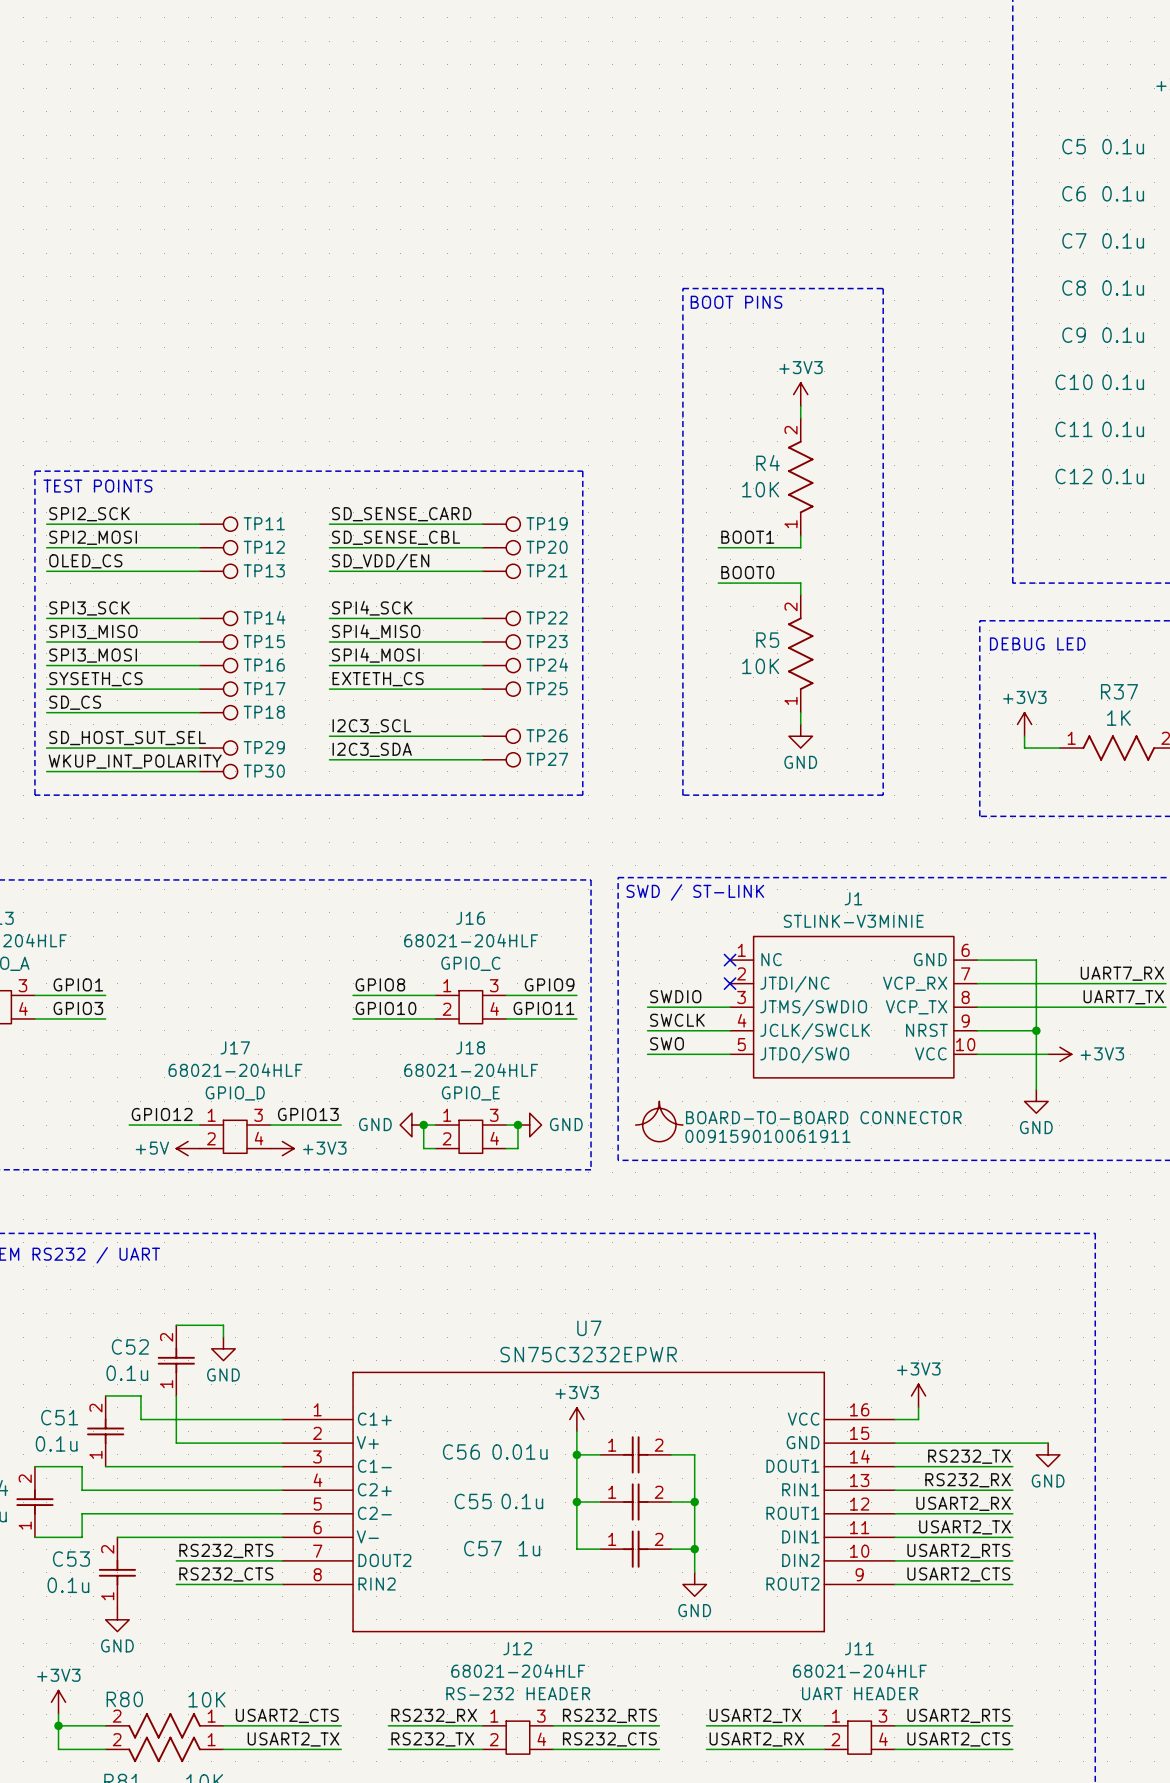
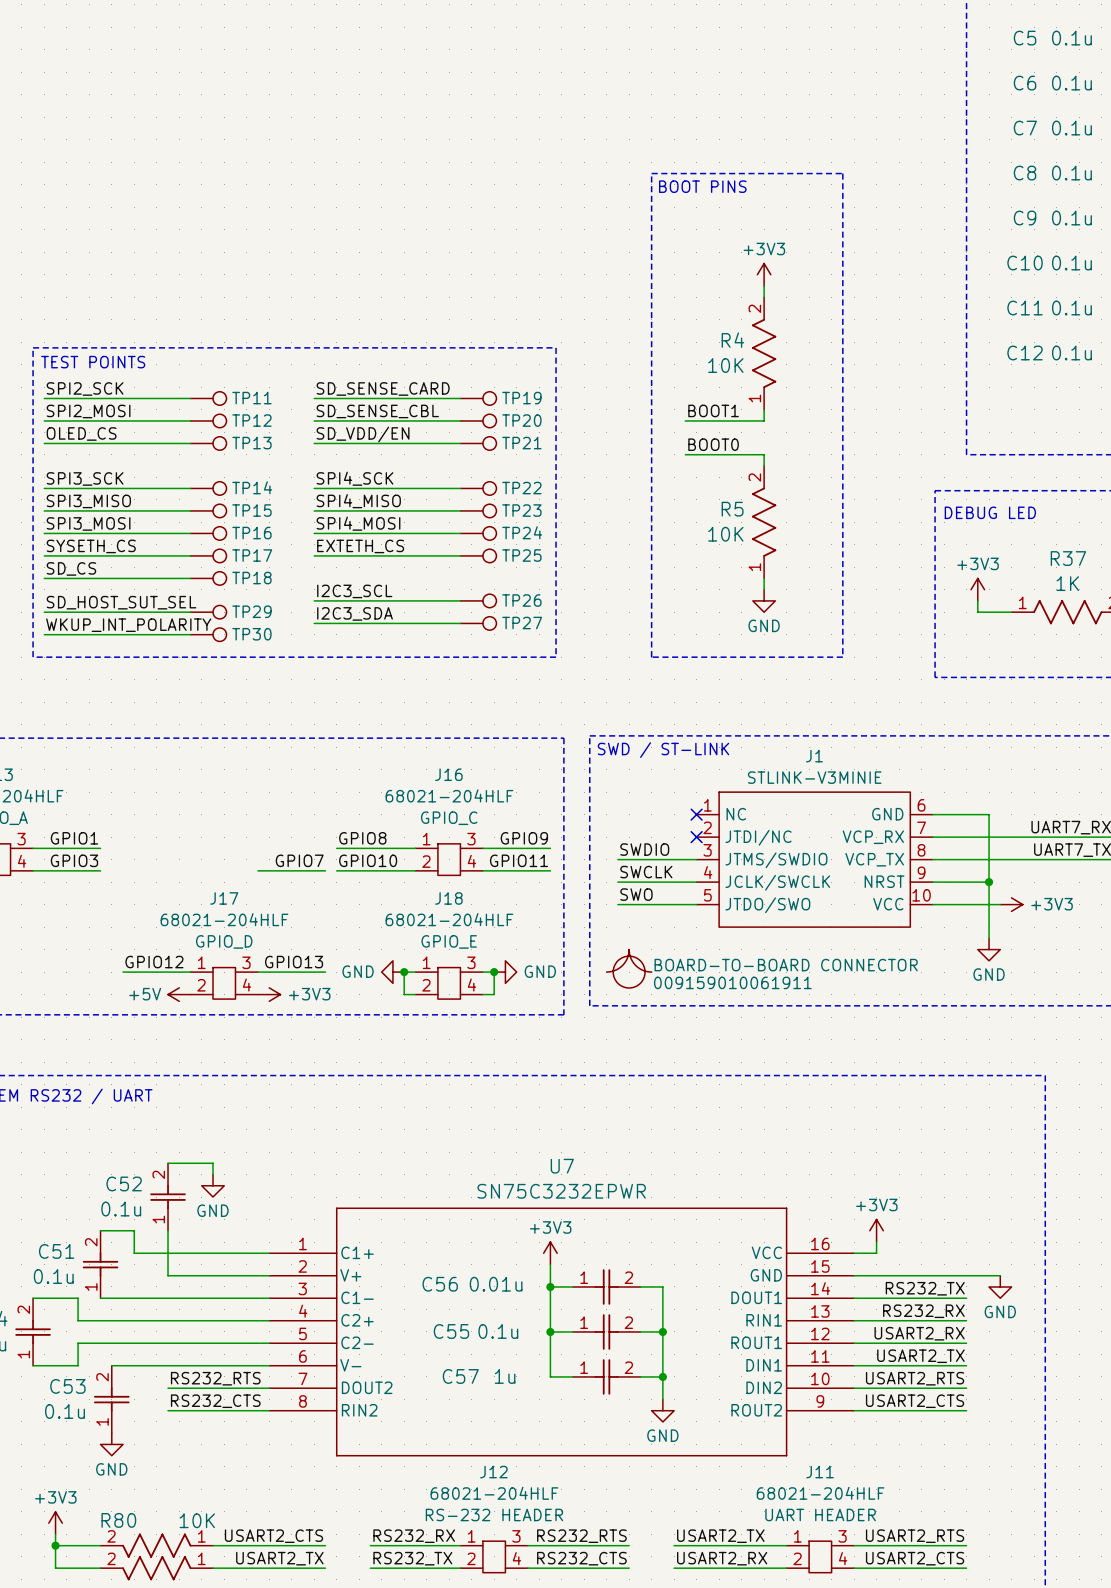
label: none -> GPIO7 (299, 860)
wire: none -> (257, 870) (325, 870)

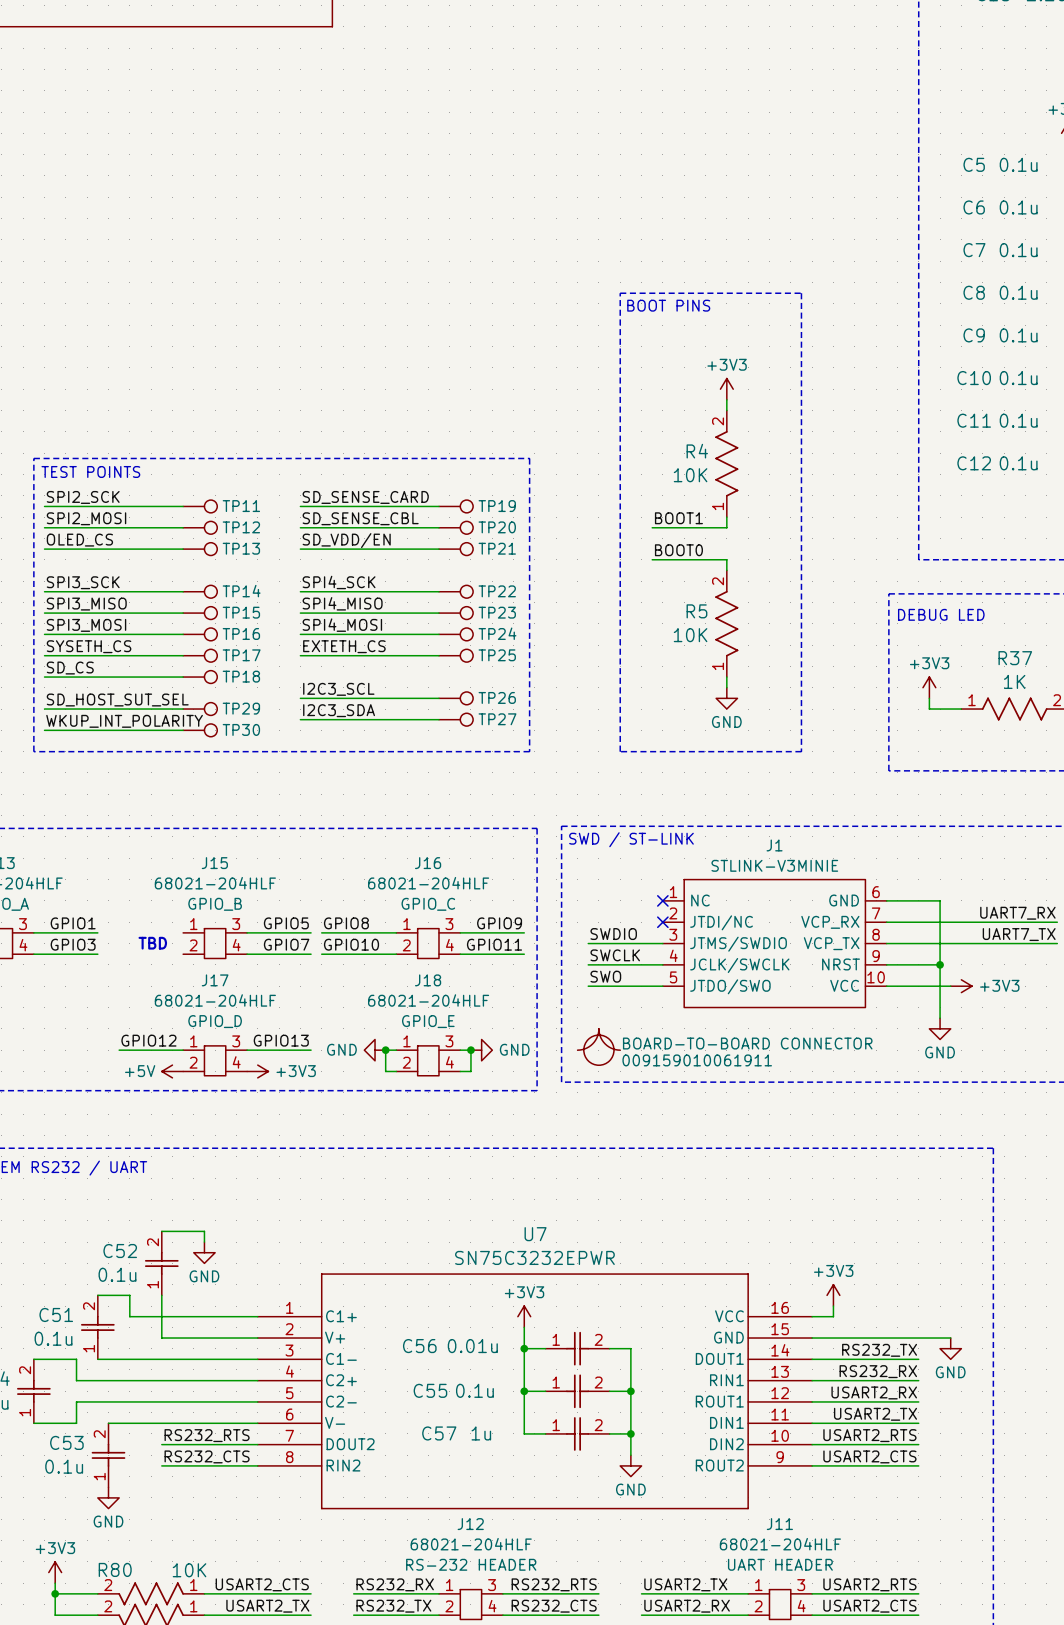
label: none -> GPIO5 (286, 923)
wire: none -> (247, 932) (311, 932)
text: none -> TBD (152, 943)
J15: none -> 68021-204HLF (215, 943)

